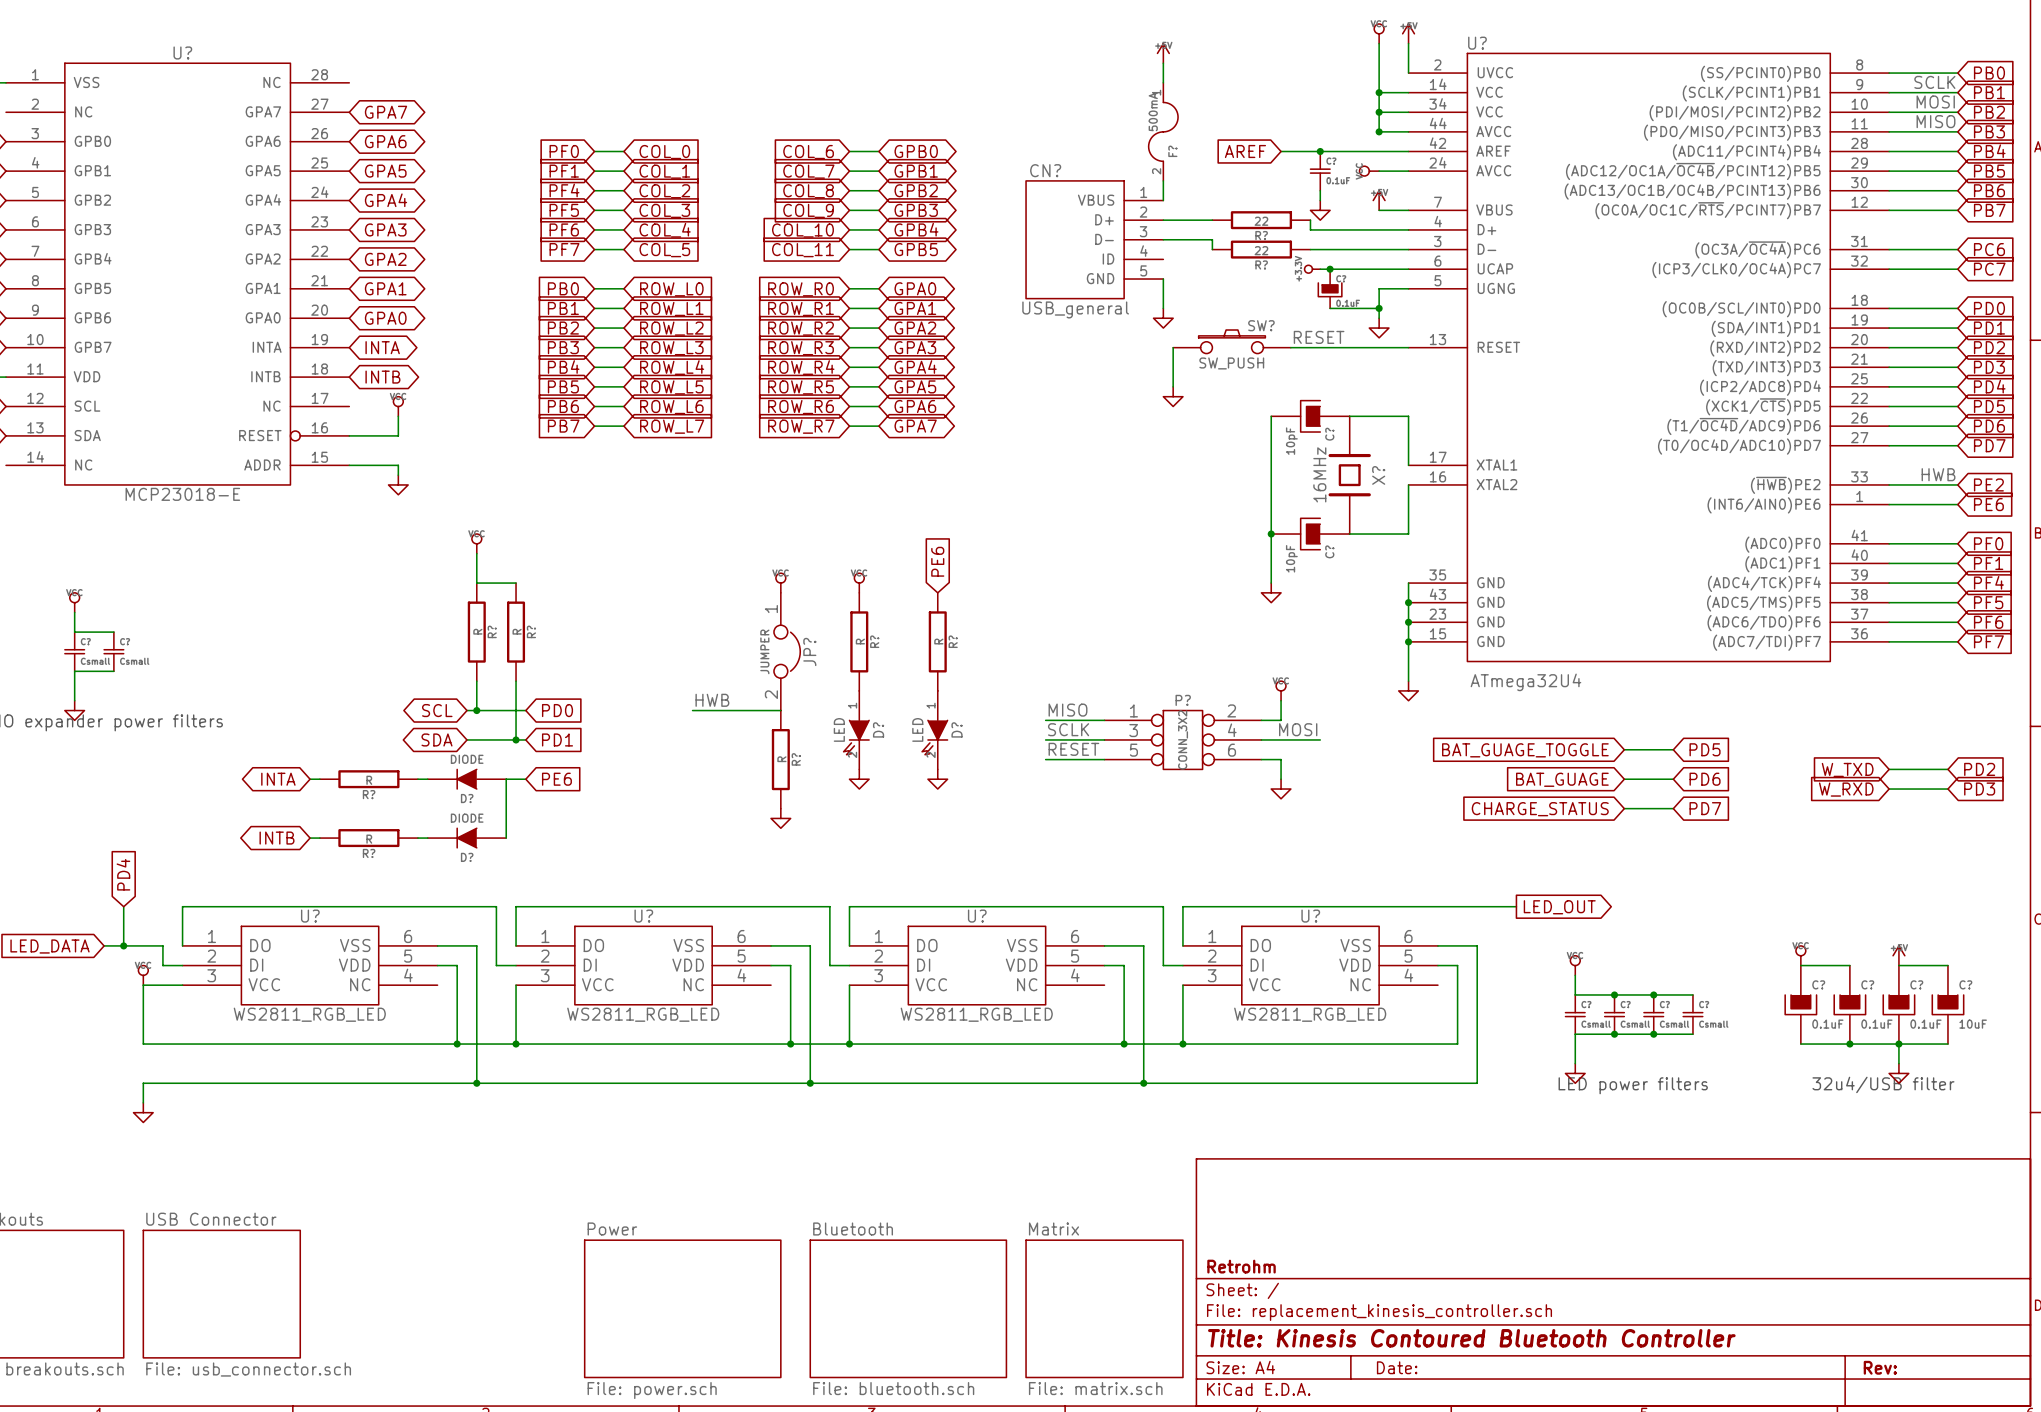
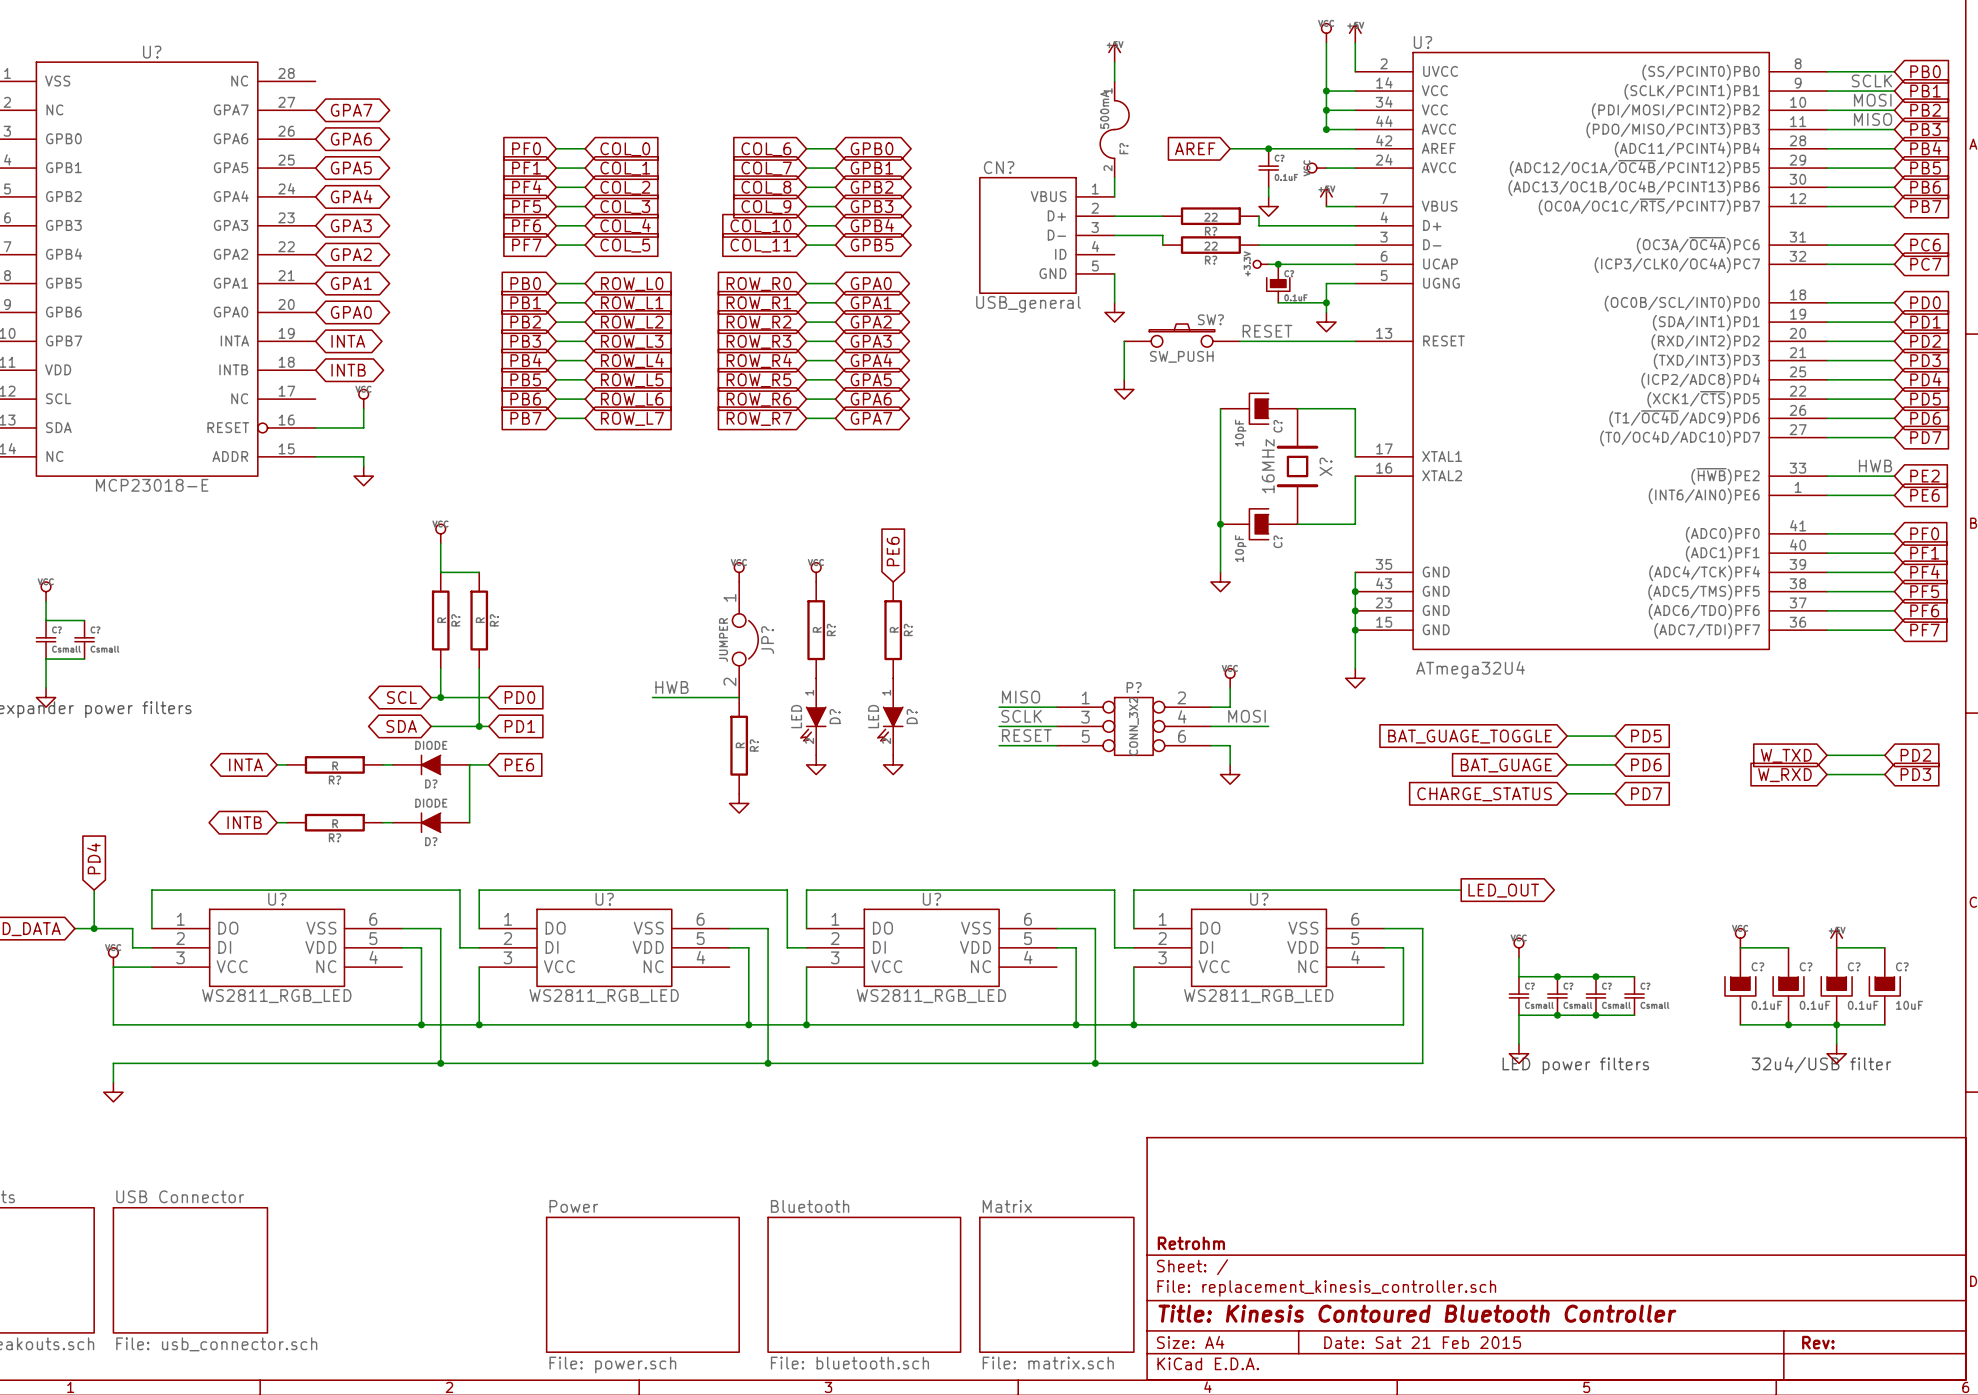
title block: Date: (1397, 1367) -> Date: Sat 21 Feb 2015 (1422, 1342)

